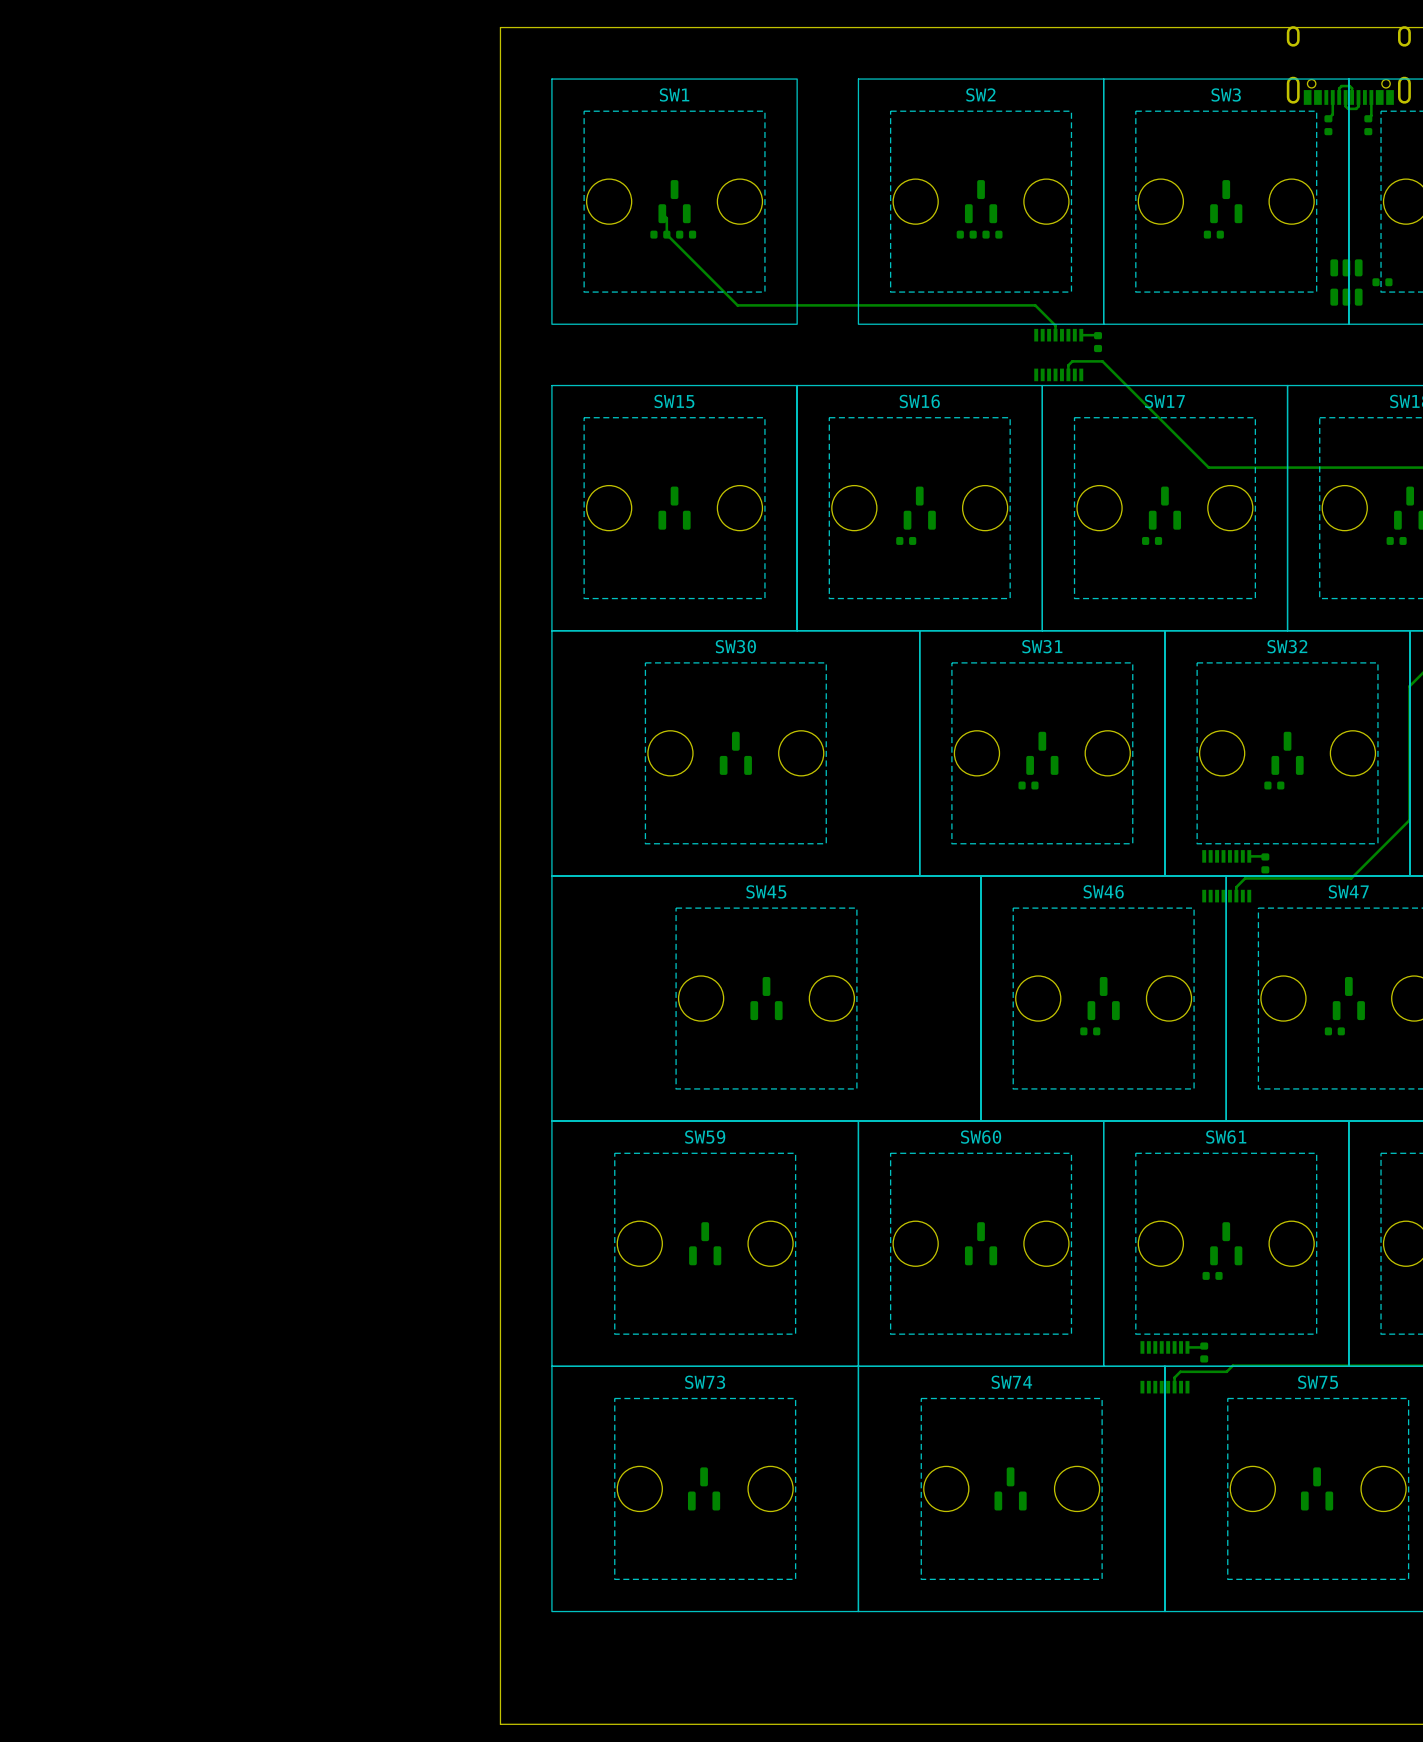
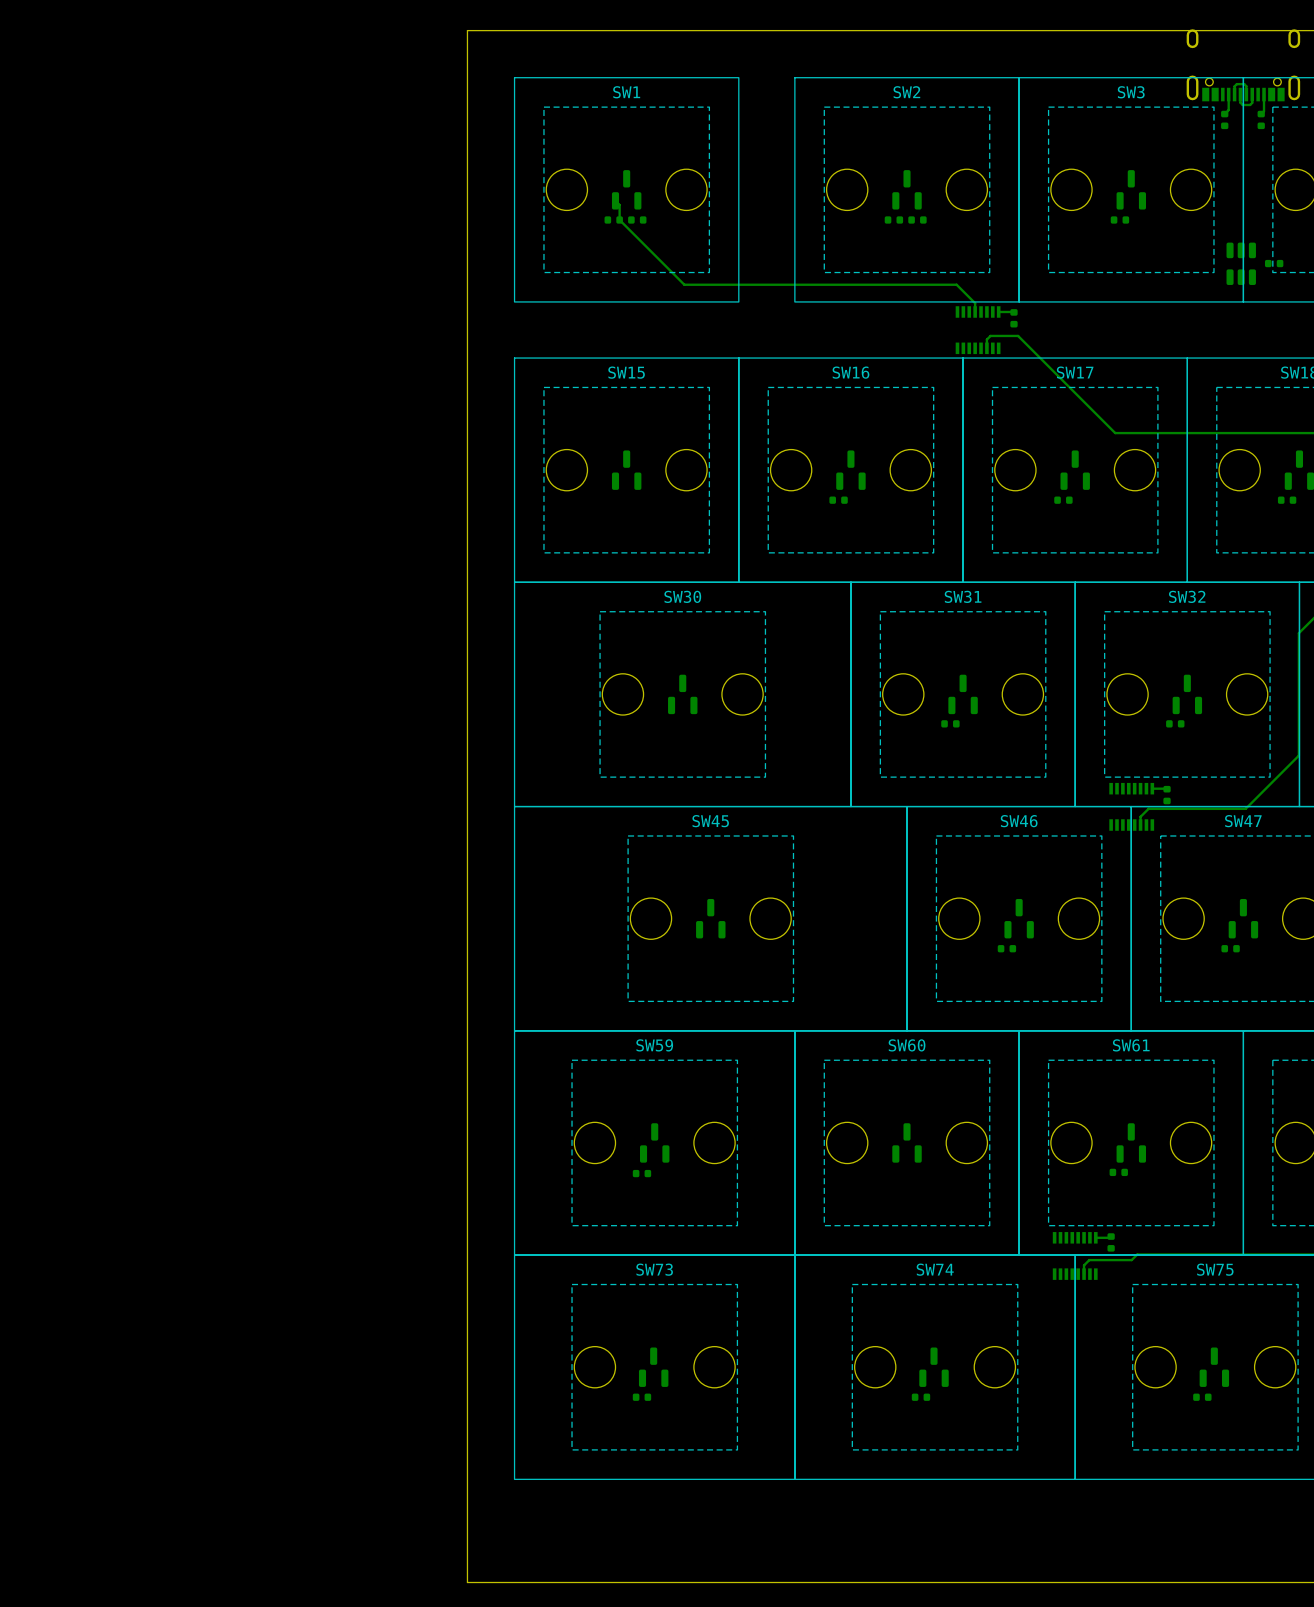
part: none -> (641, 1173)
part: none -> (641, 1397)
part: none -> (920, 1397)
part: none -> (1202, 1397)

